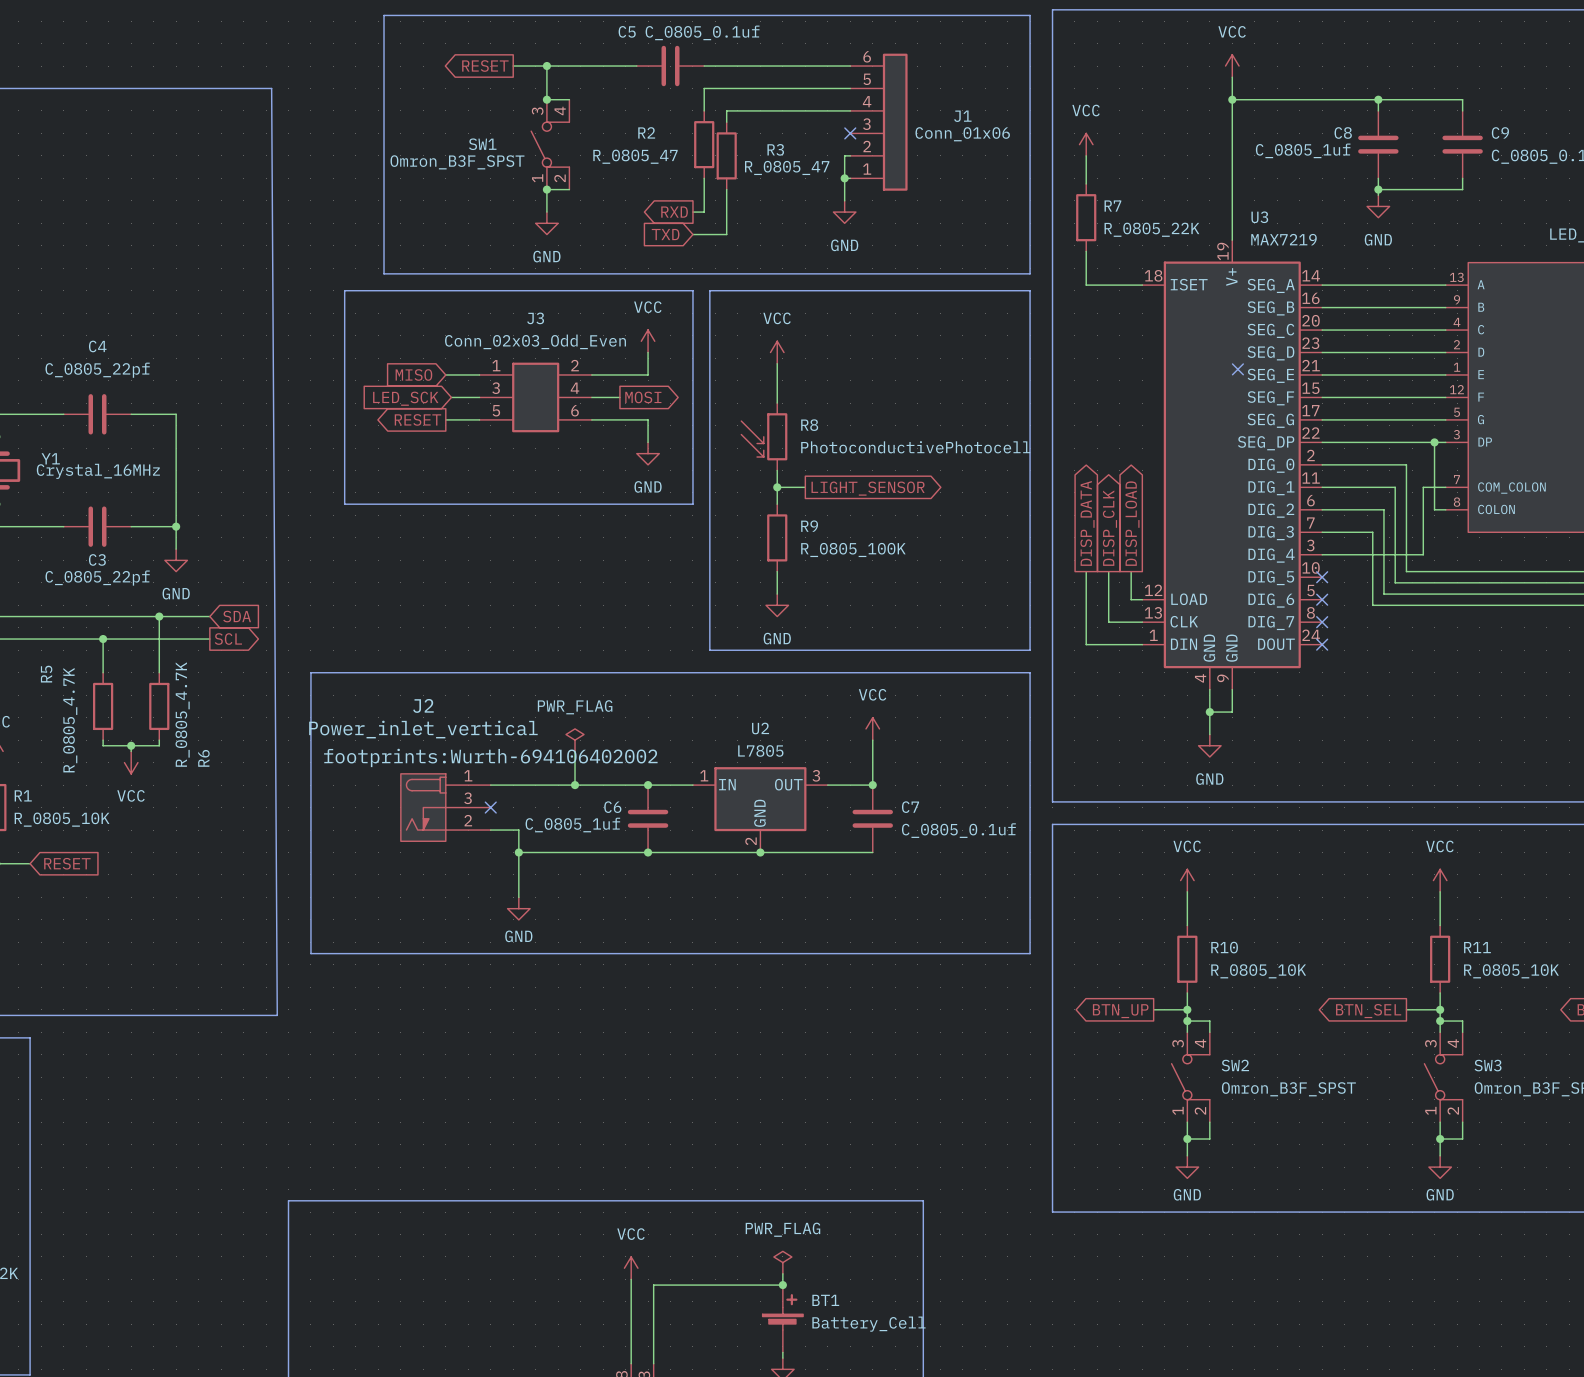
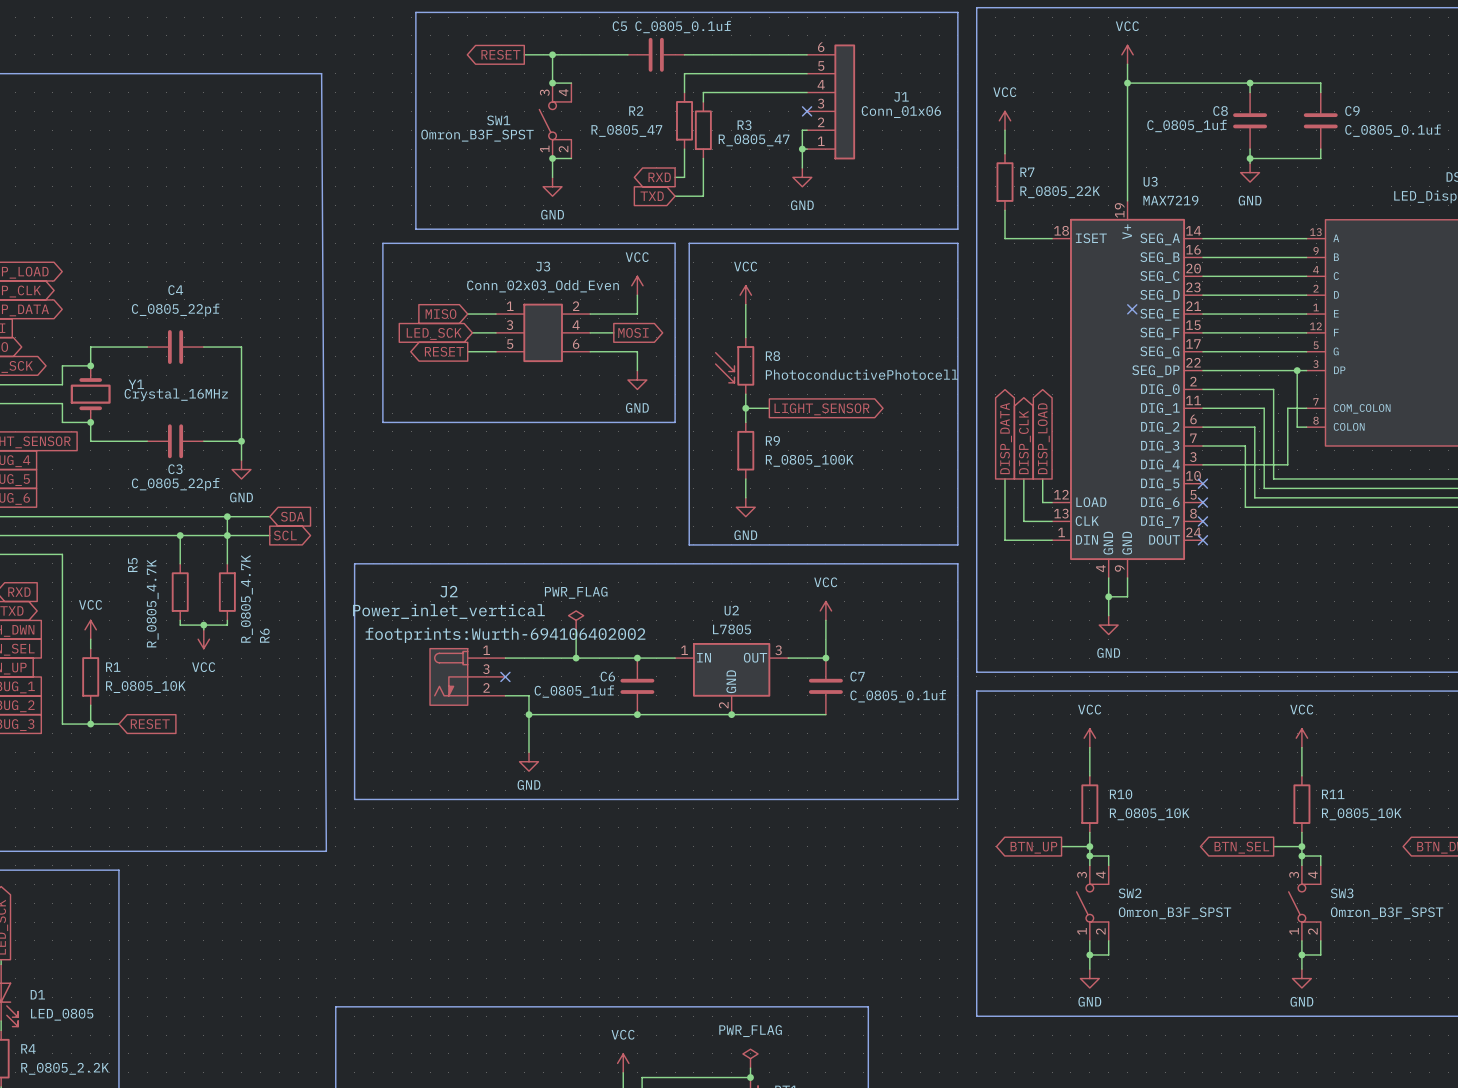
junction: none -> (227, 535)

